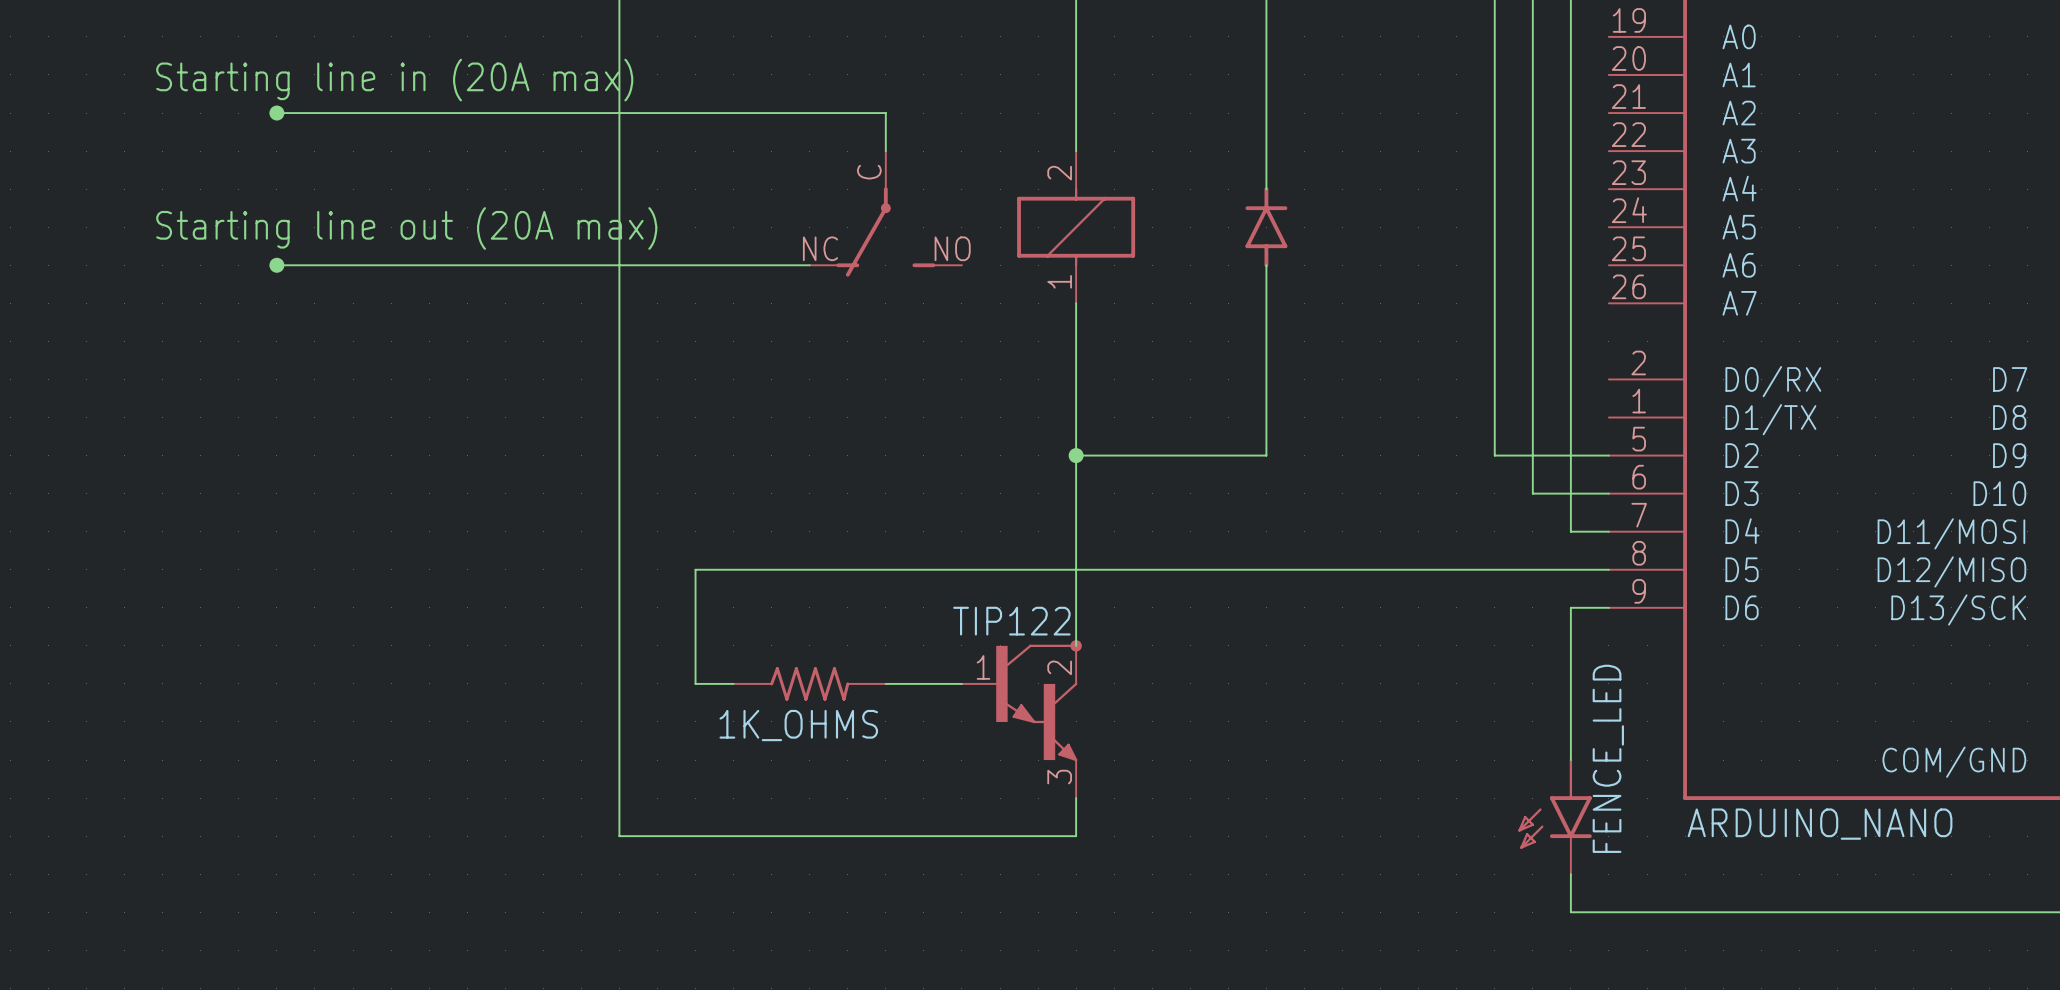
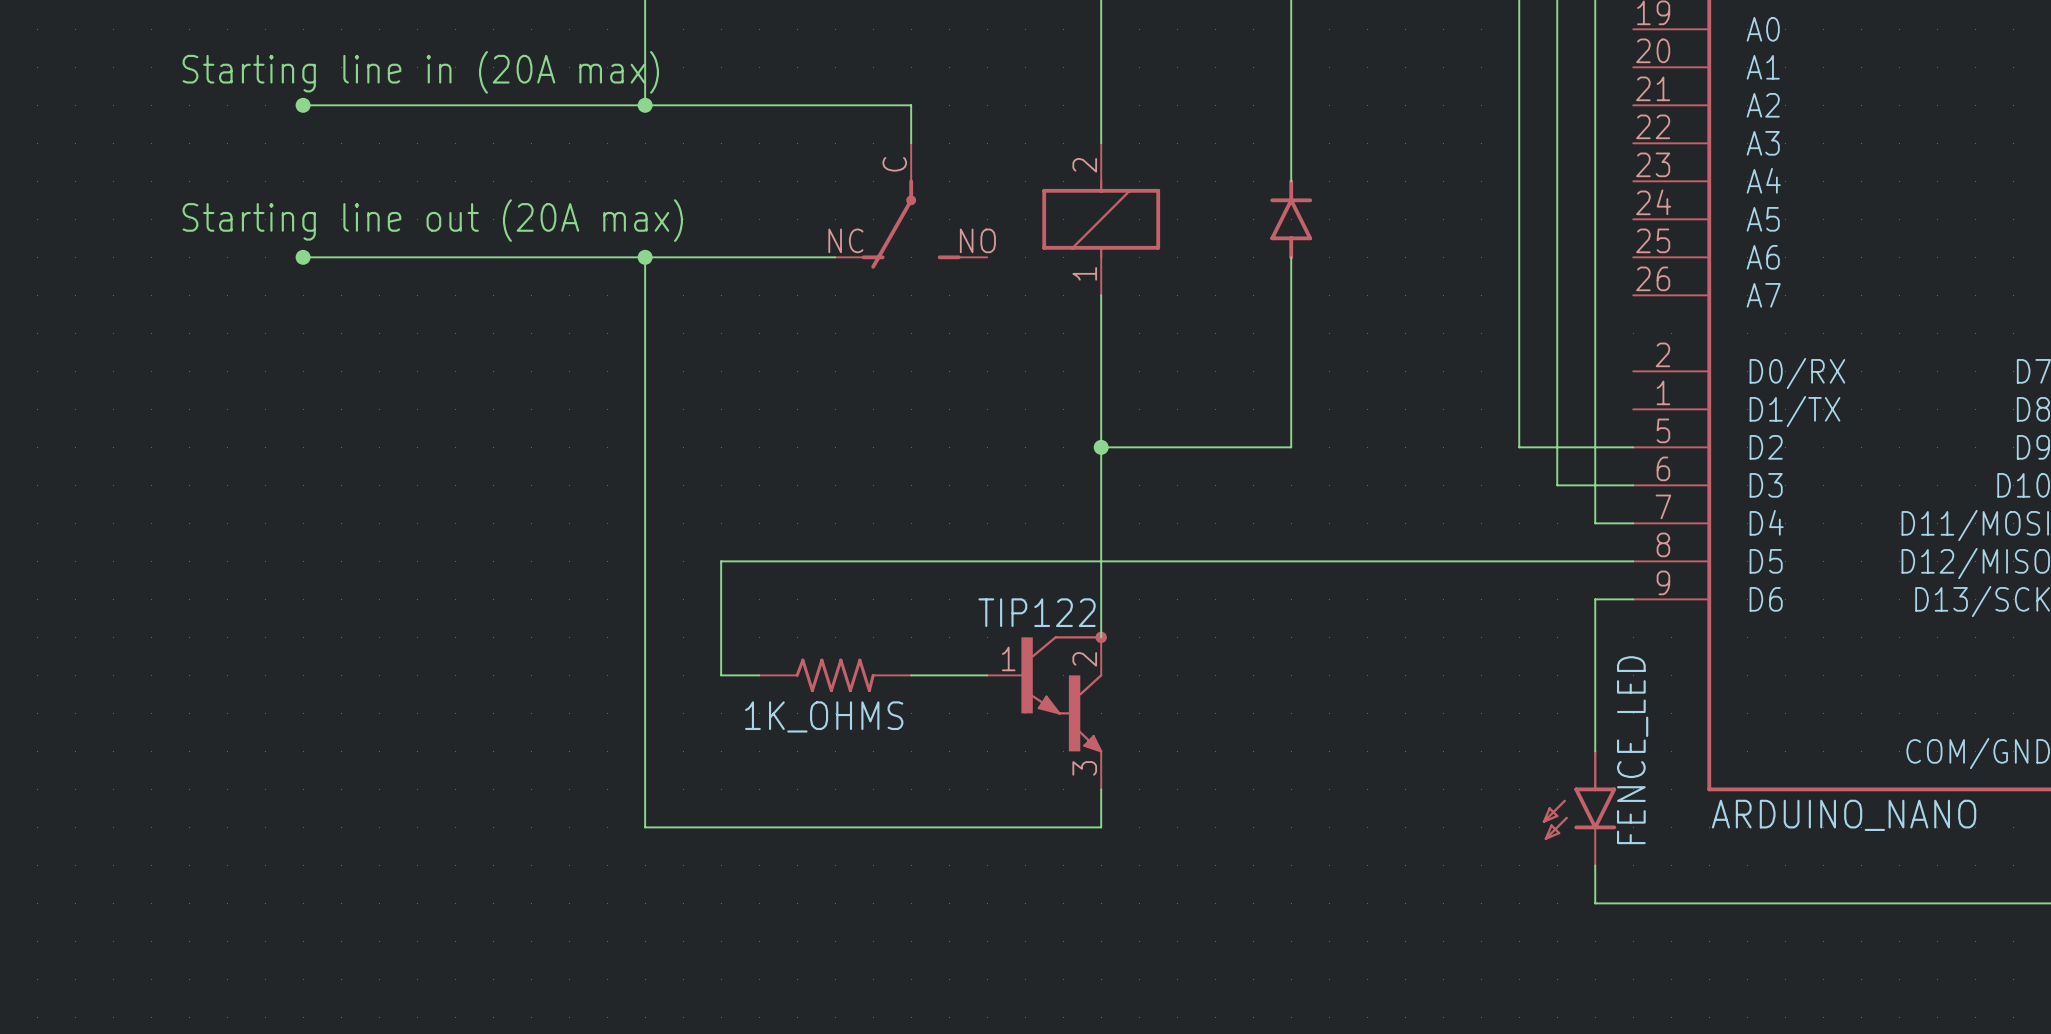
wire: (619, 113) (619, 265) -> none
junction: none -> (645, 105)
junction: none -> (645, 257)

